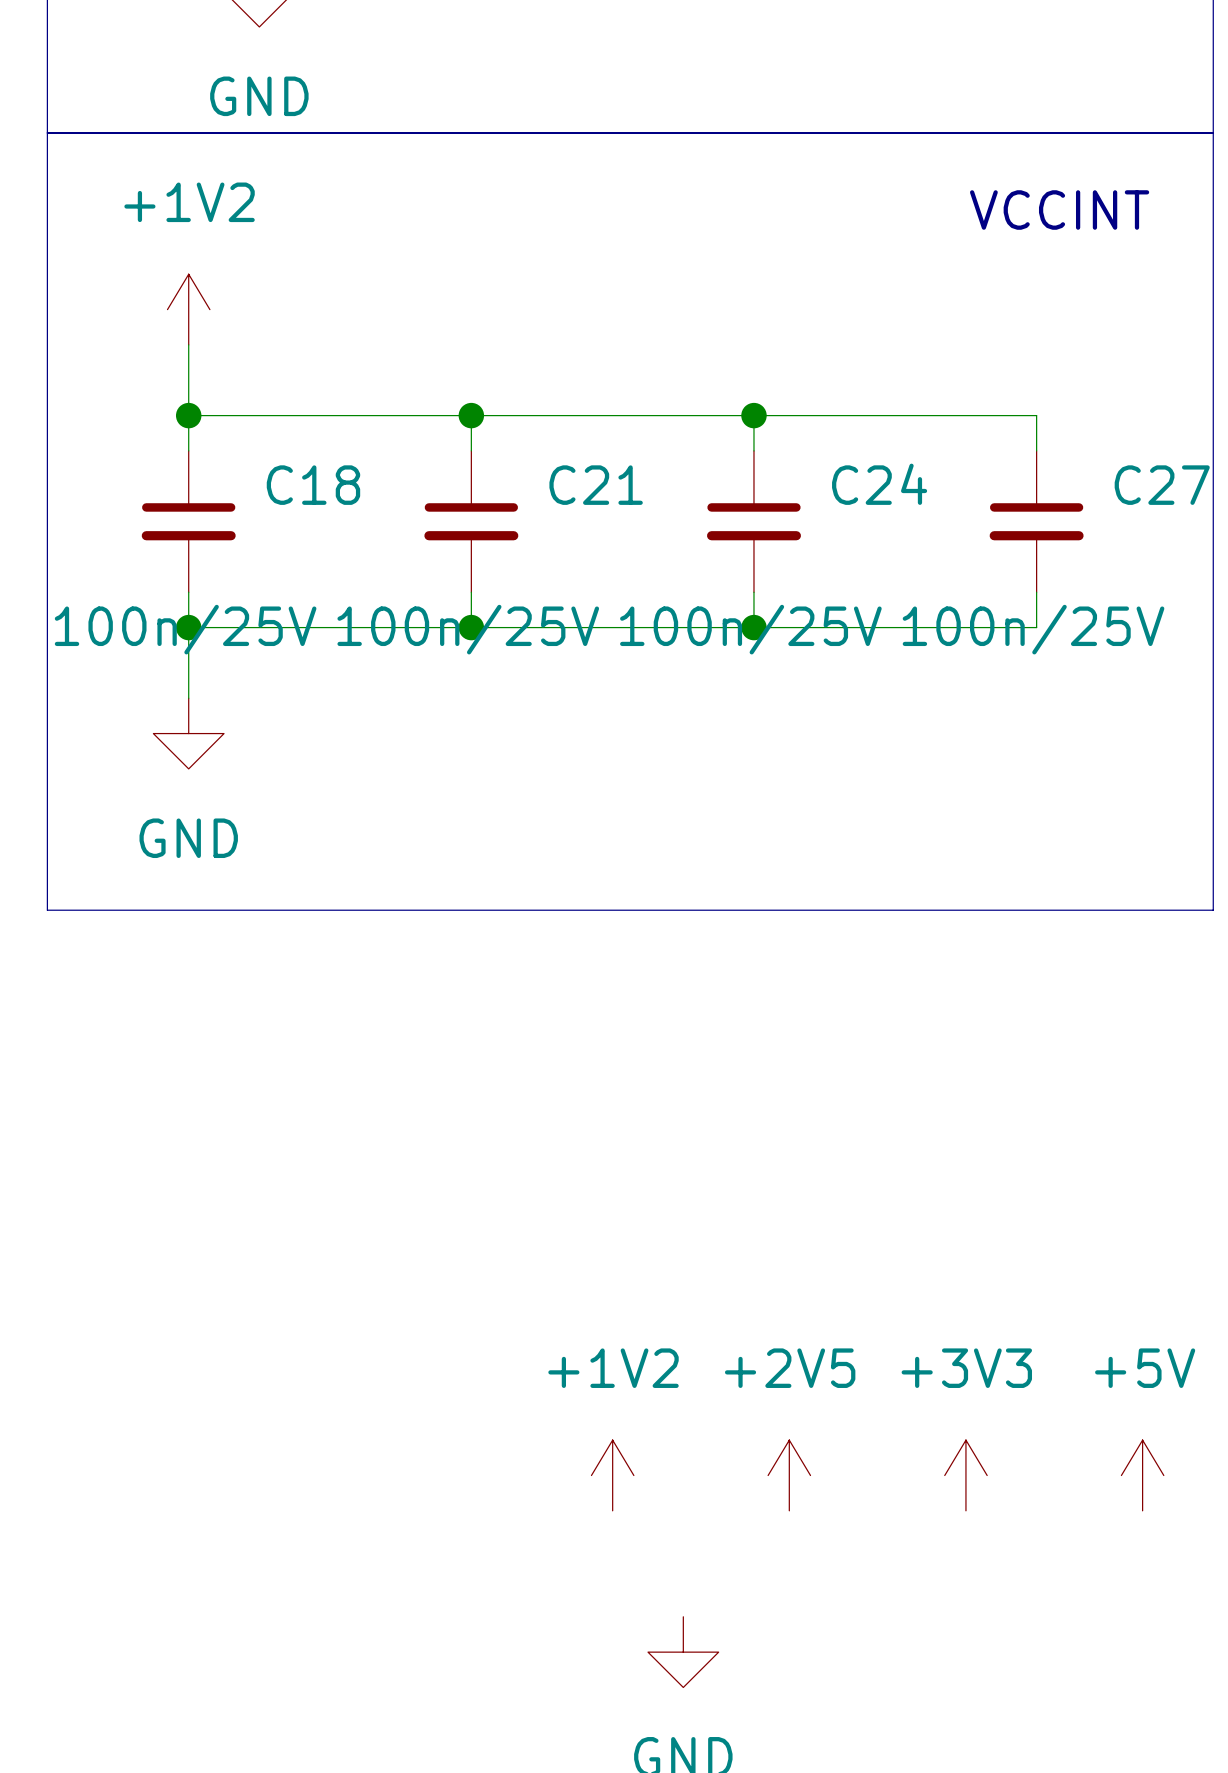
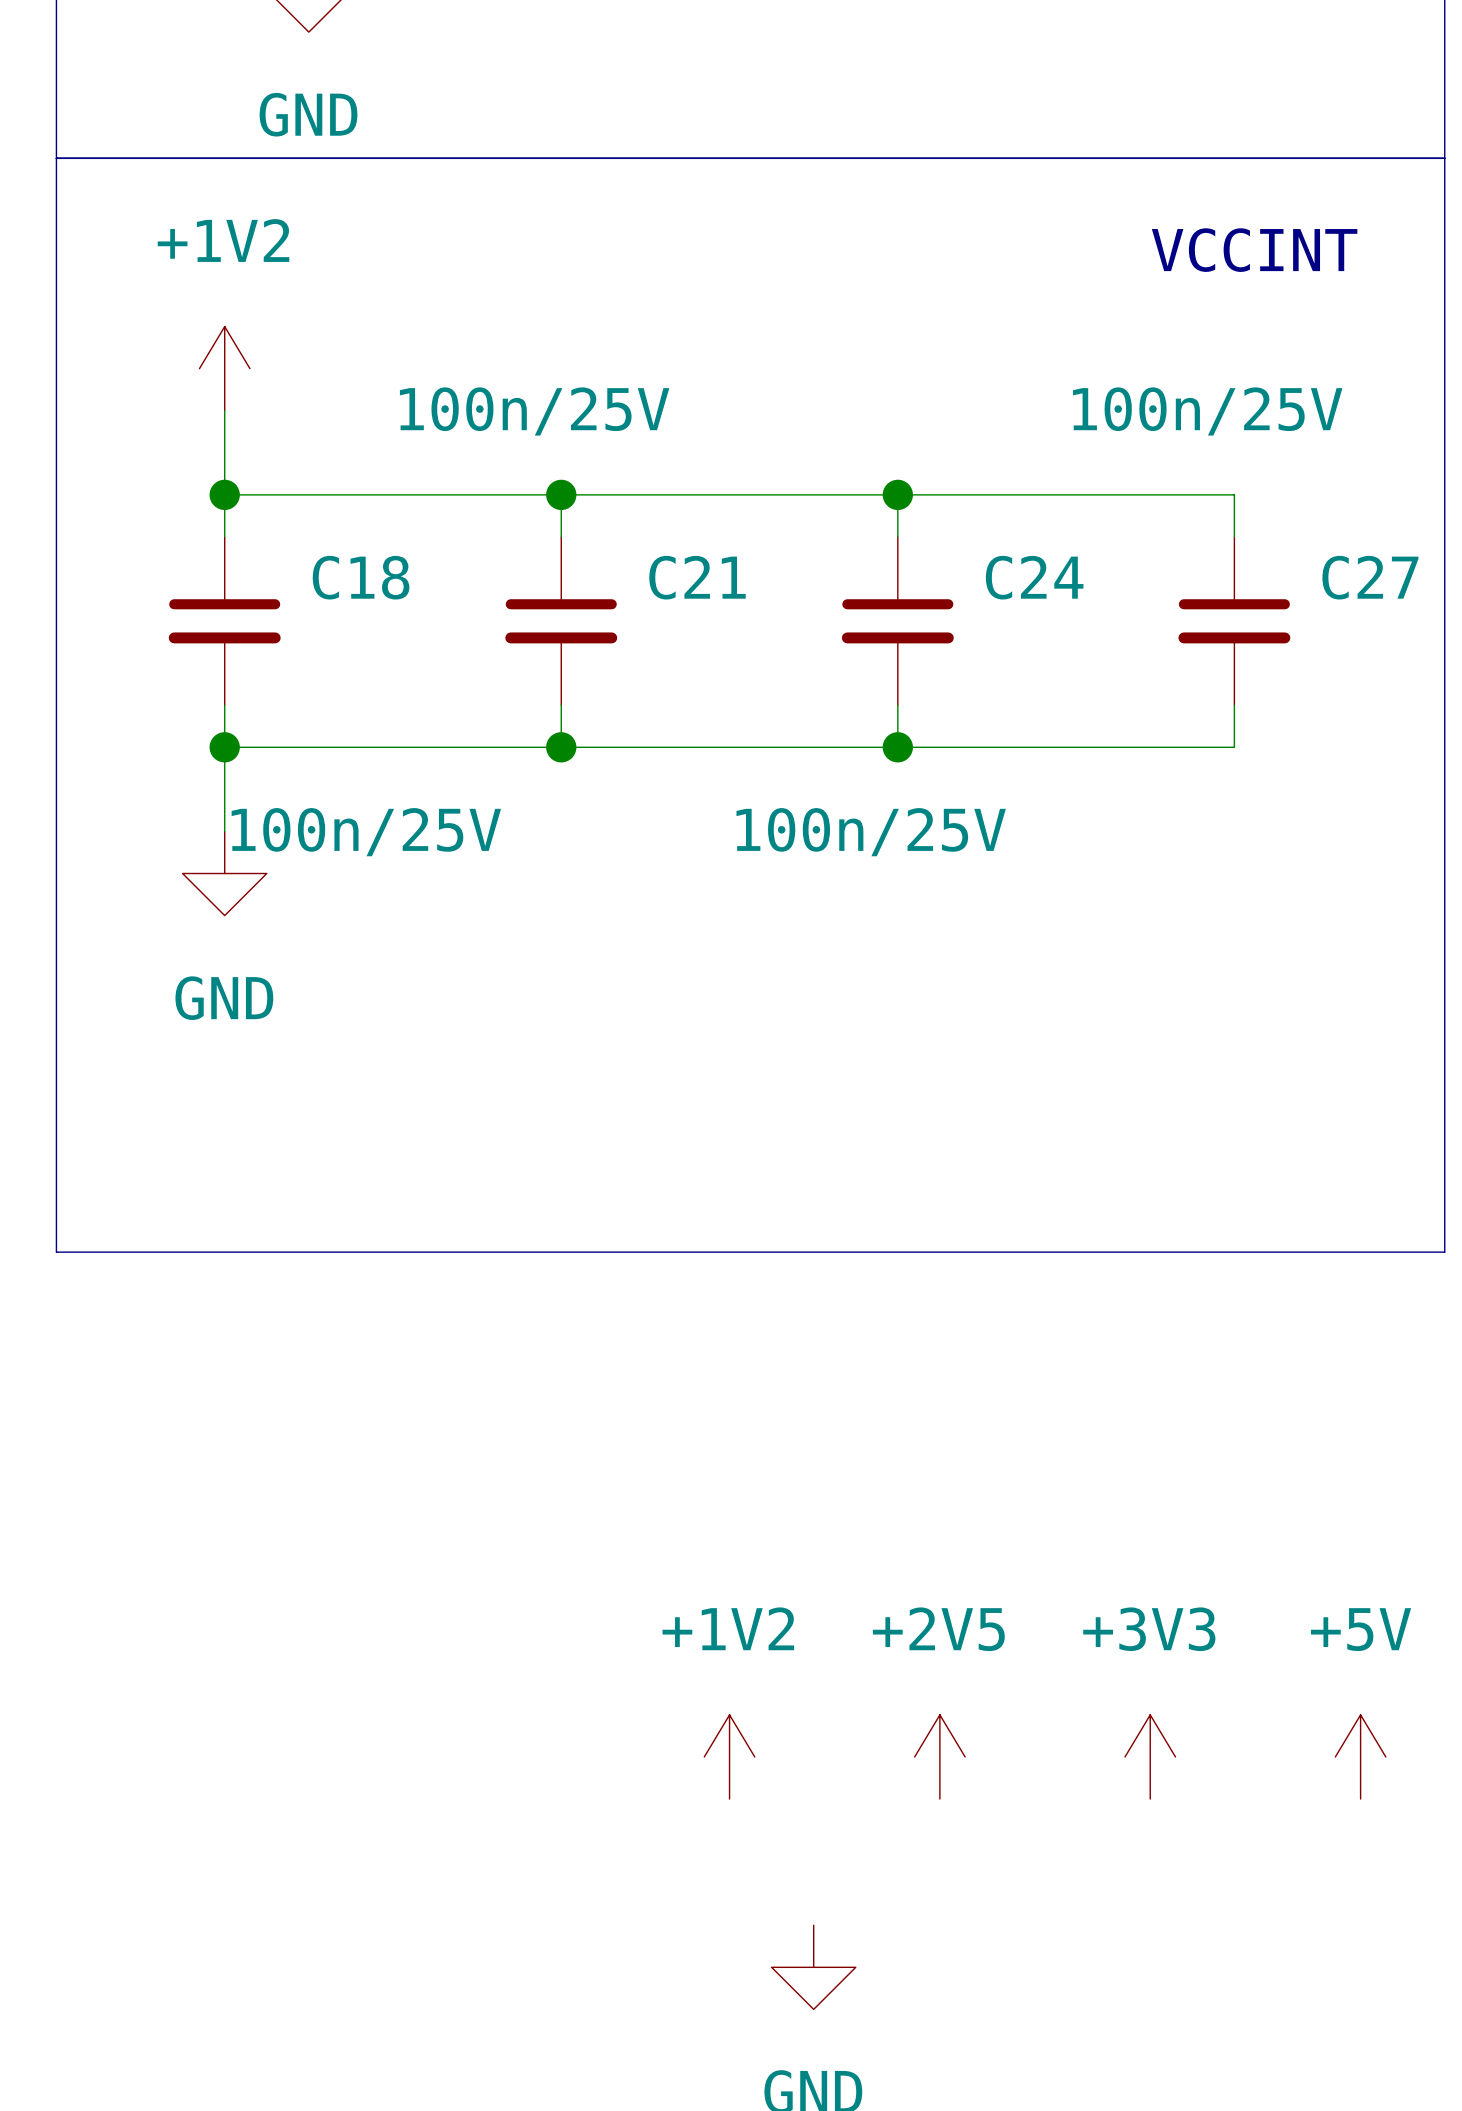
C18 value position: 100n/25V (185, 629) -> 100n/25V (366, 832)
C21 value position: 100n/25V (468, 629) -> 100n/25V (534, 411)
C24 value position: 100n/25V (750, 629) -> 100n/25V (871, 832)
C27 value position: 100n/25V (1033, 629) -> 100n/25V (1207, 411)
line: (47, 910) (1213, 910) -> (56, 1083) (56, 1252) (1444, 1252) (1444, 1083)

